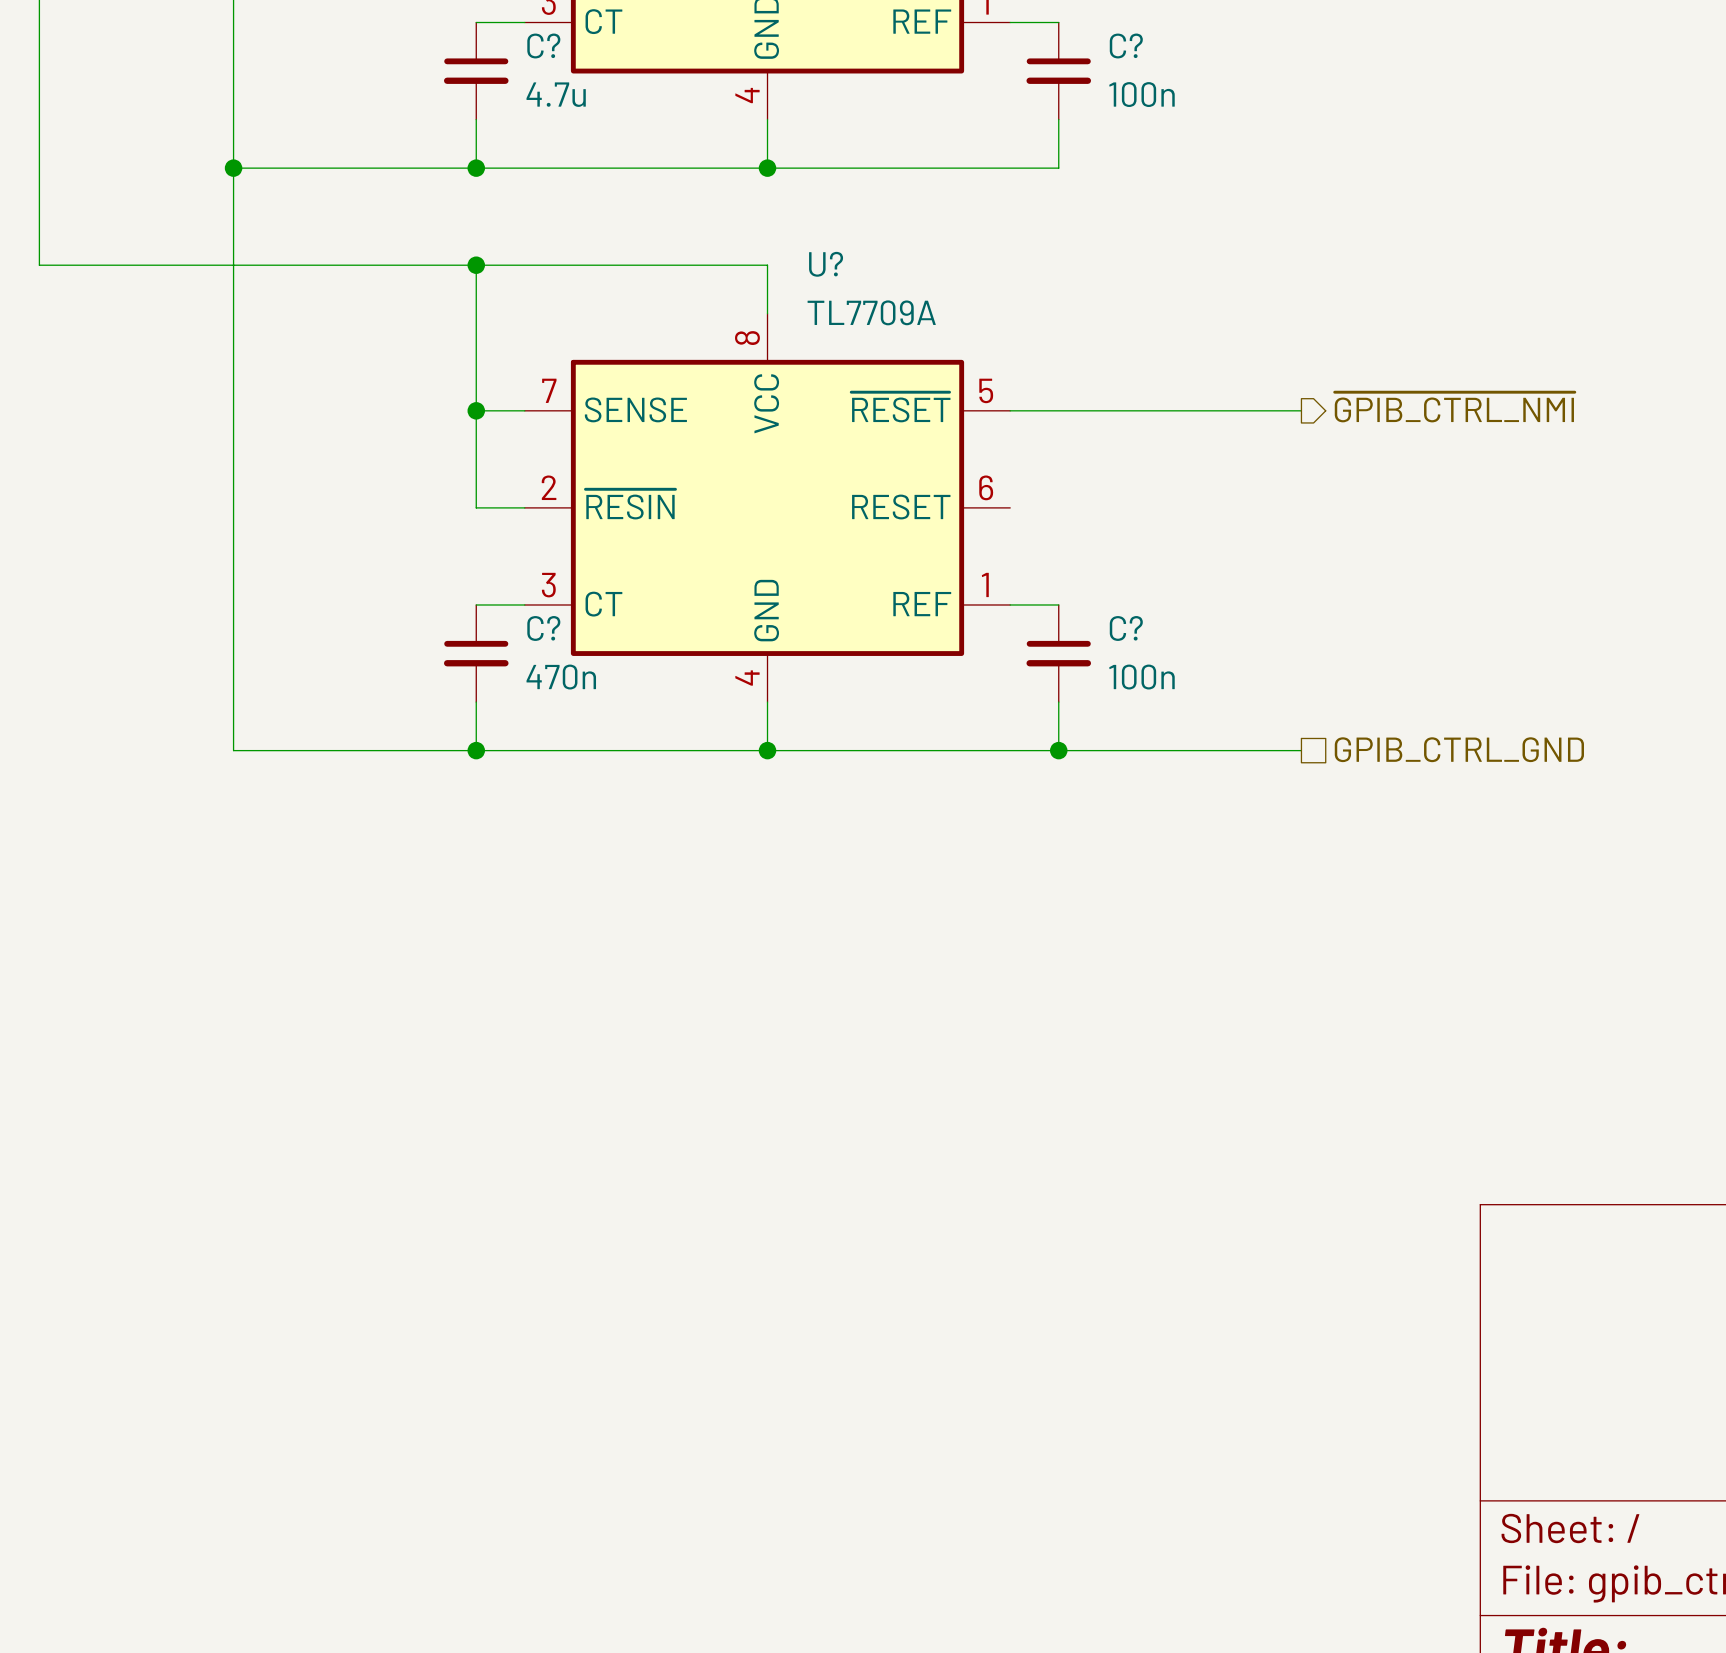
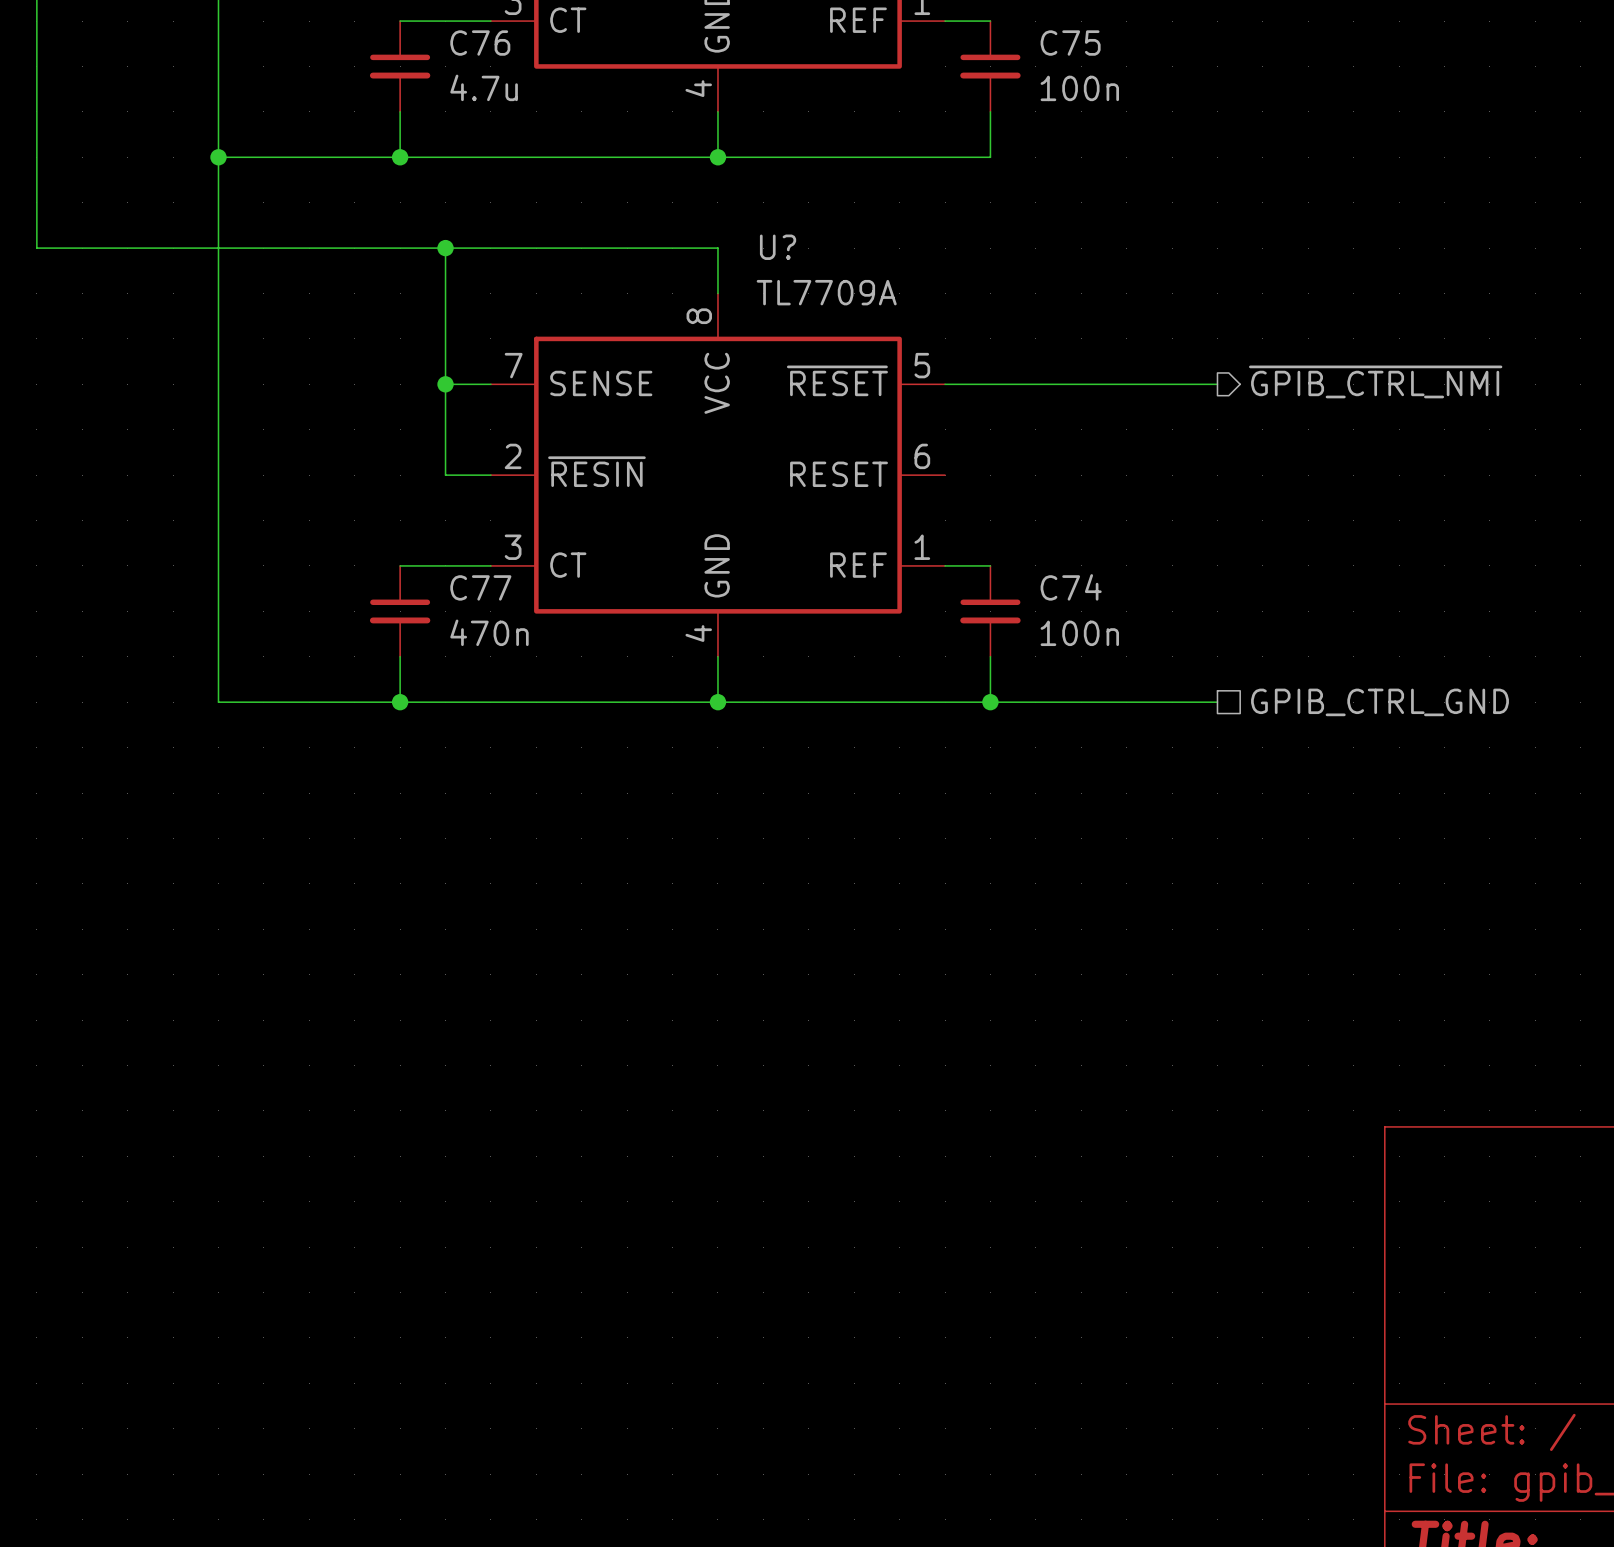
wire: none -> (400, 21) (445, 21)
C? name: C? (1126, 45) -> C75 (1070, 43)
C76: none -> 4.7u (400, 66)
C?: 4.7u (476, 71) -> none
wire: (476, 119) (476, 168) -> (400, 111) (400, 157)
junction position: (476, 168) -> (400, 157)
wire: none -> (400, 565) (445, 565)
C? name: C? (1126, 628) -> C74 (1071, 587)
C77: none -> 470n (400, 611)
C?: 470n (476, 653) -> none
wire: (476, 702) (476, 750) -> (400, 656) (400, 702)
junction position: (476, 750) -> (400, 702)

